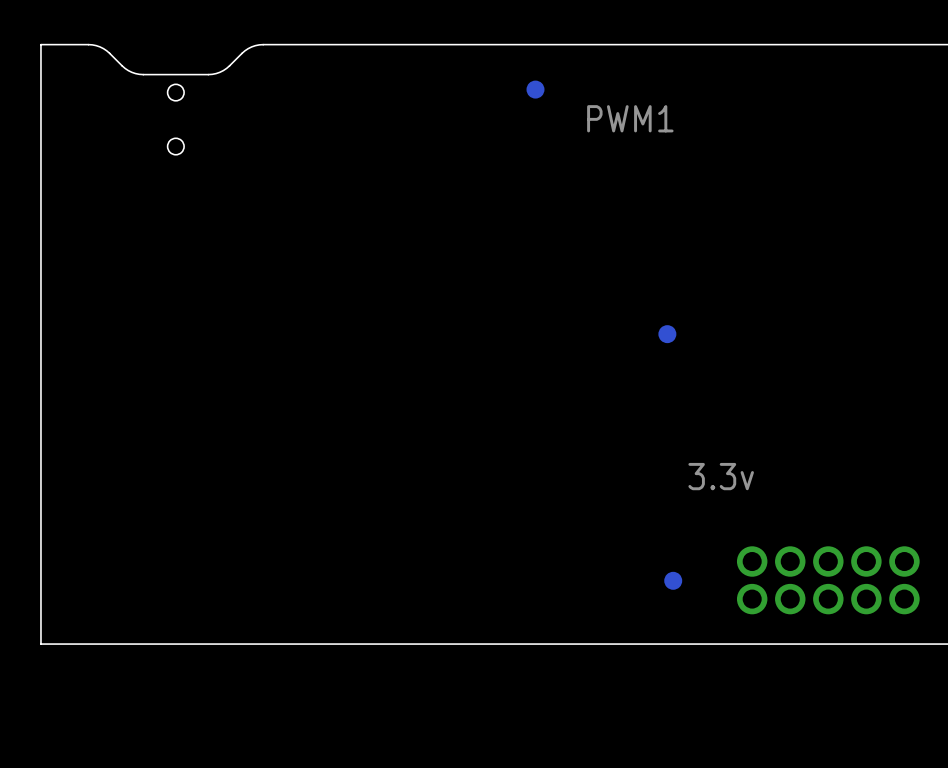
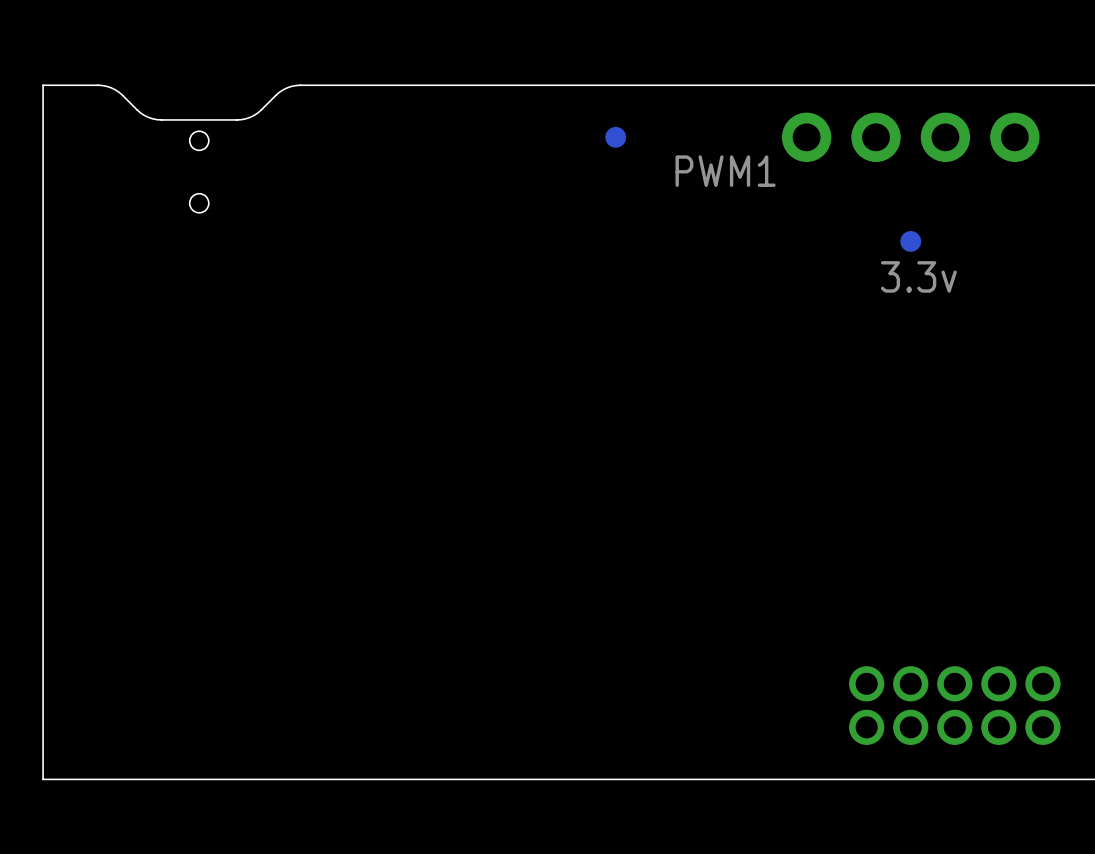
part: none -> (910, 137)
part position: (667, 334) -> (910, 241)
text position: 3.3v (721, 476) -> 3.3v (918, 276)
part: (673, 580) -> none

